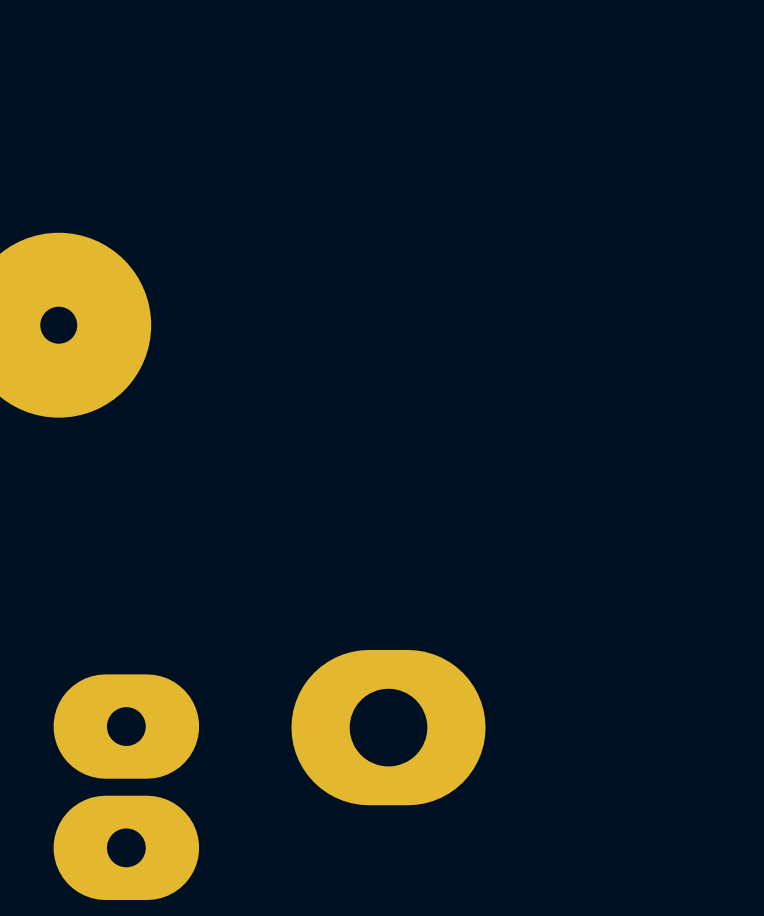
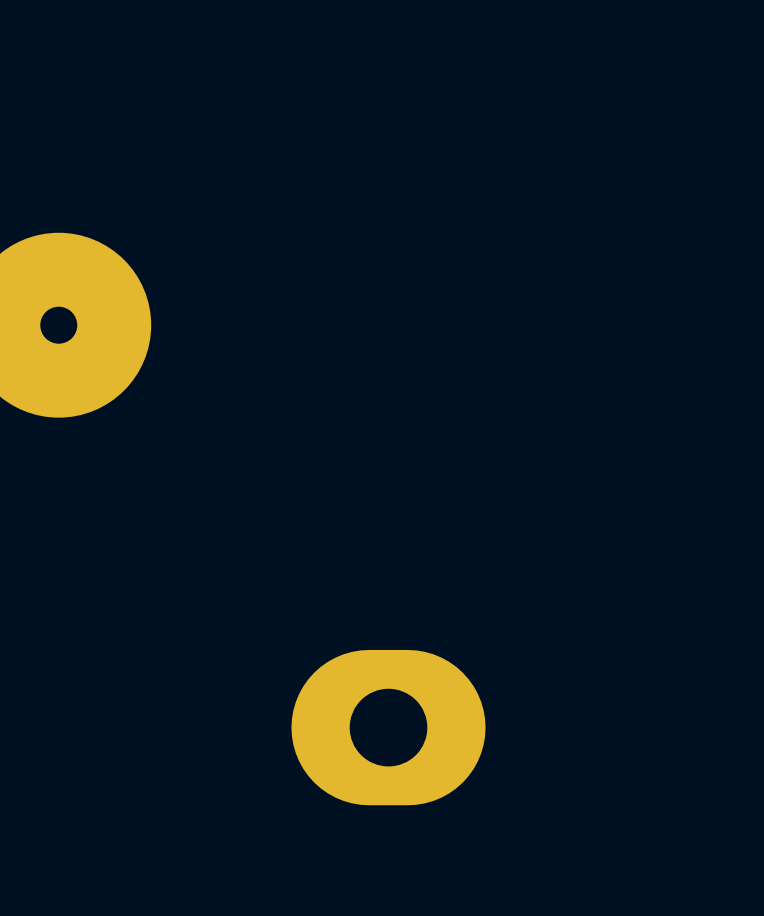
part: (126, 787) -> none

